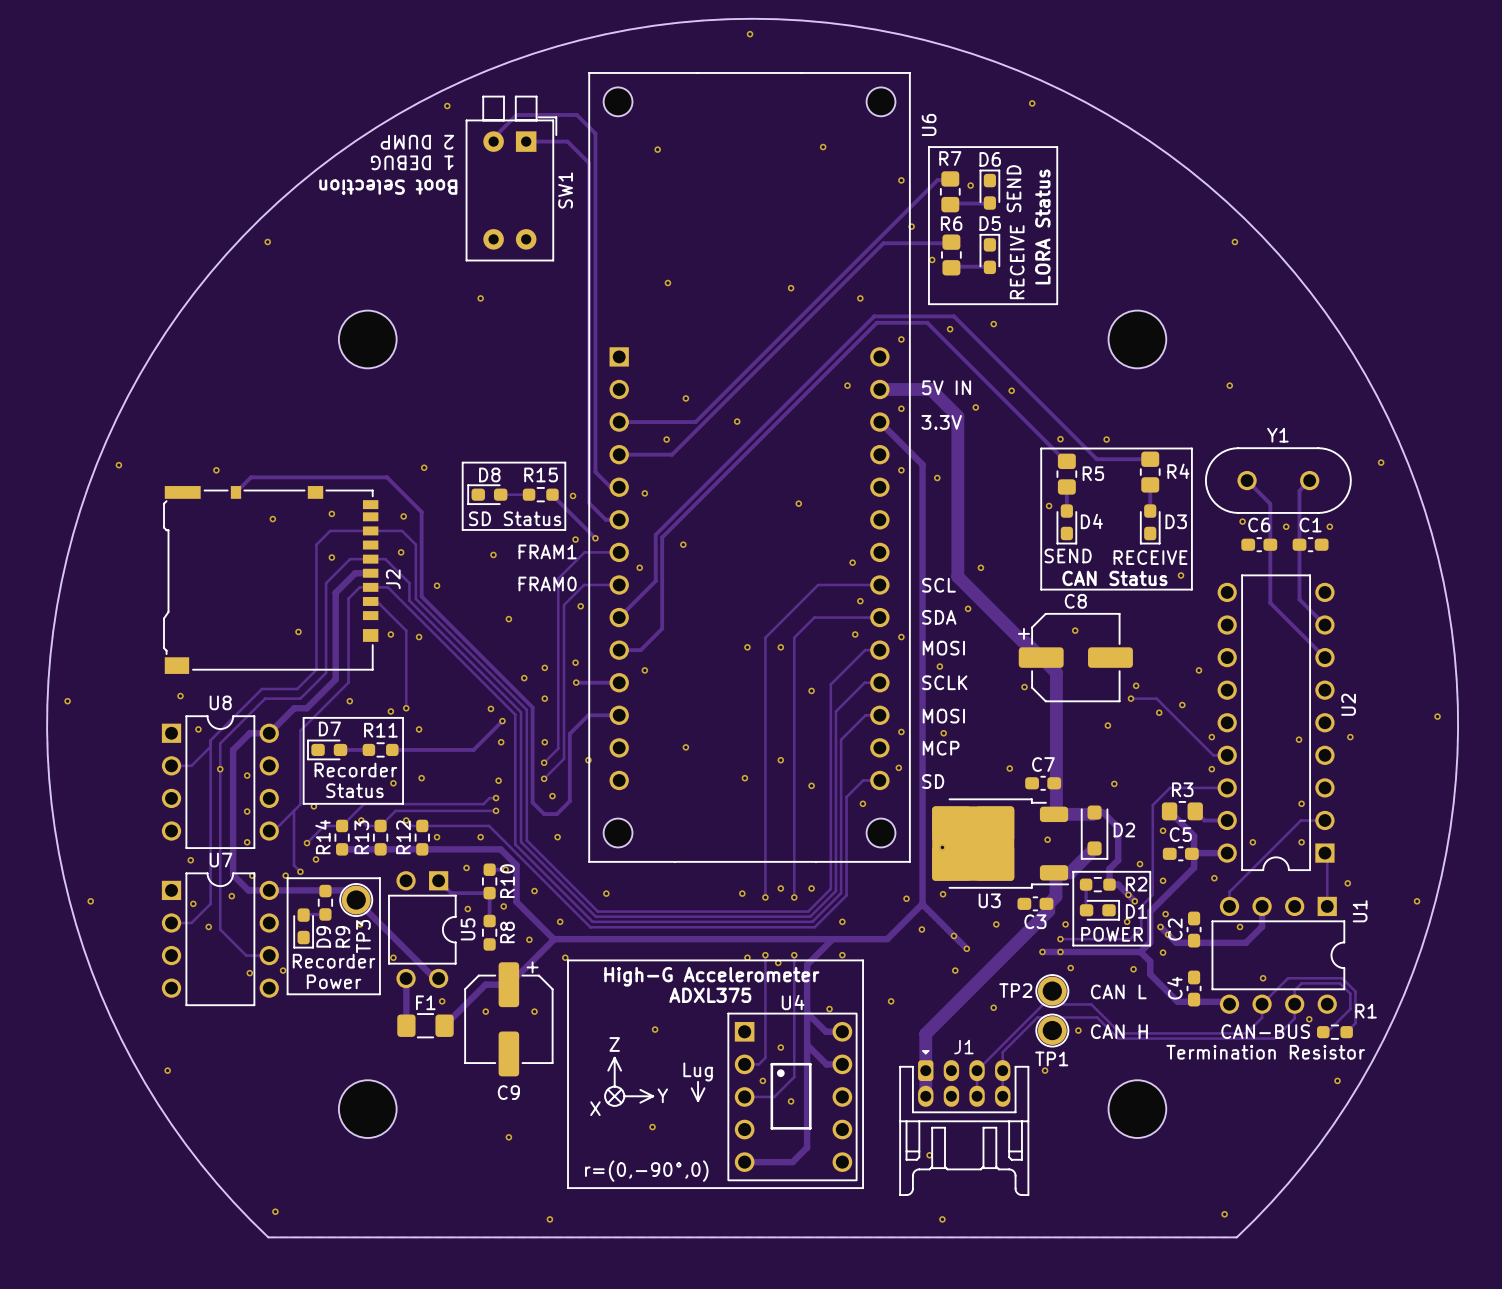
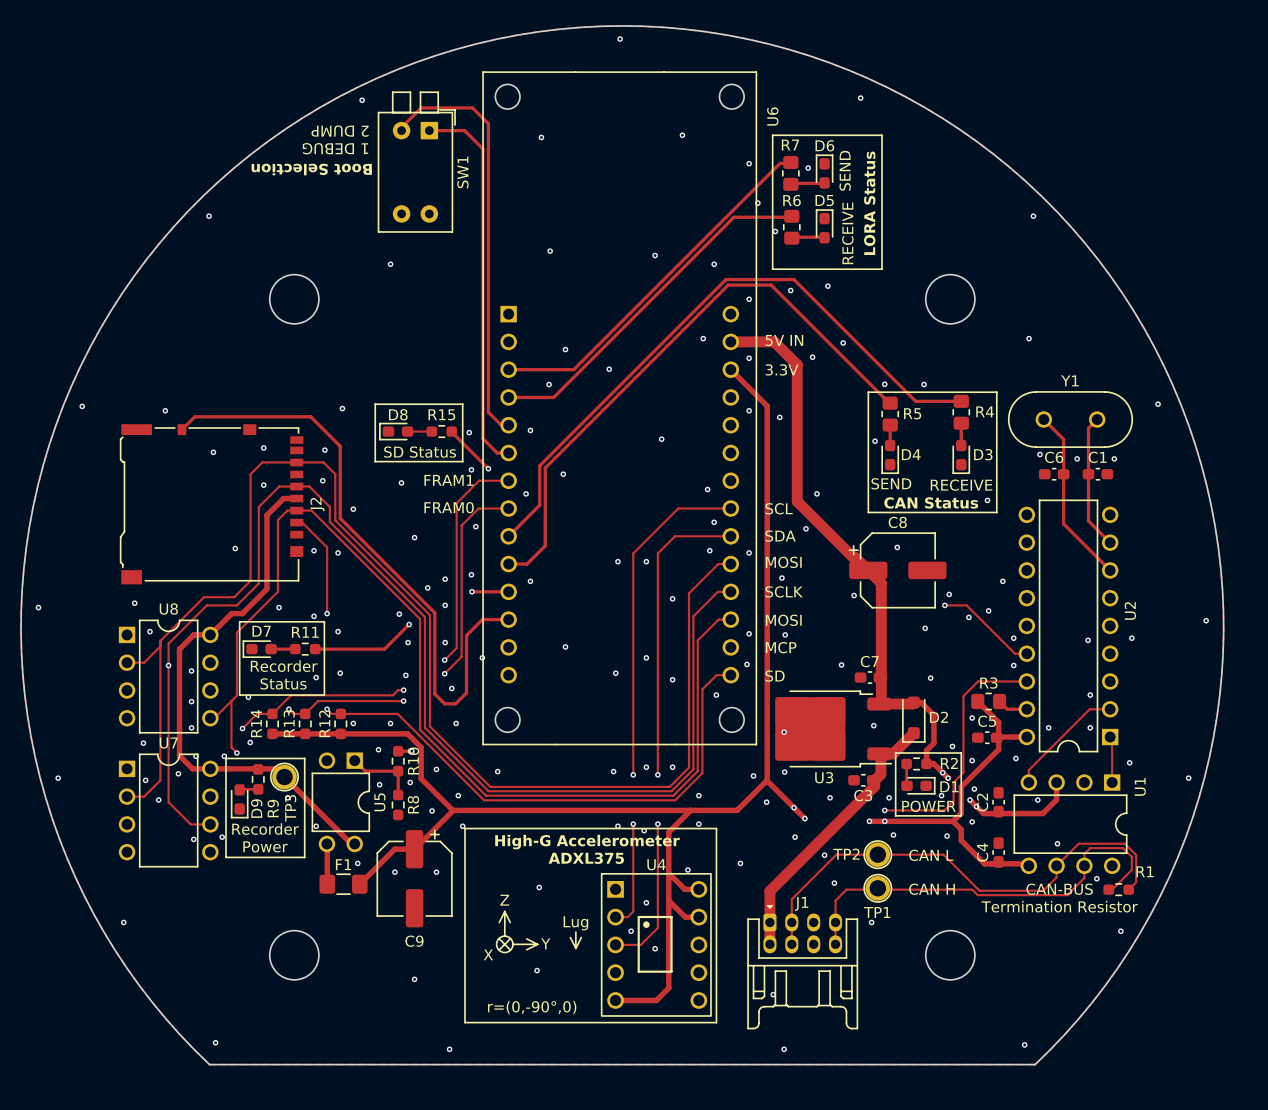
via: none -> (824, 855)
track: none -> (828, 862) (791, 899) (791, 944)
track: none -> (828, 862) (836, 854) (943, 854) (979, 890)
via: (993, 1007) -> none
via: none -> (834, 883)
via: (1078, 1030) -> none
track: (1015, 1032) (1043, 1004) (1091, 1004) (1120, 1033) (1171, 1033) -> (846, 889) (972, 889) (977, 895)
track: (1169, 1038) (1118, 1038) (1097, 1017) (1037, 1017) (1002, 1052) -> none
track: (1002, 1044) (977, 1070) (977, 1096) -> (835, 900) (835, 906)

